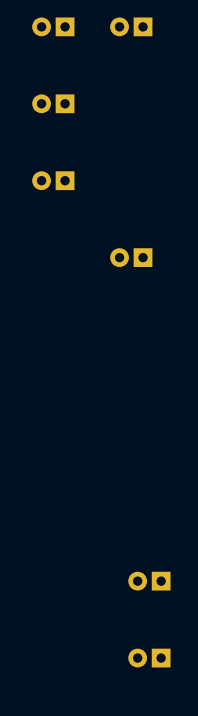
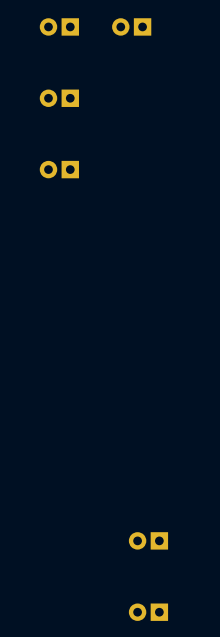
part: (131, 257) -> none

